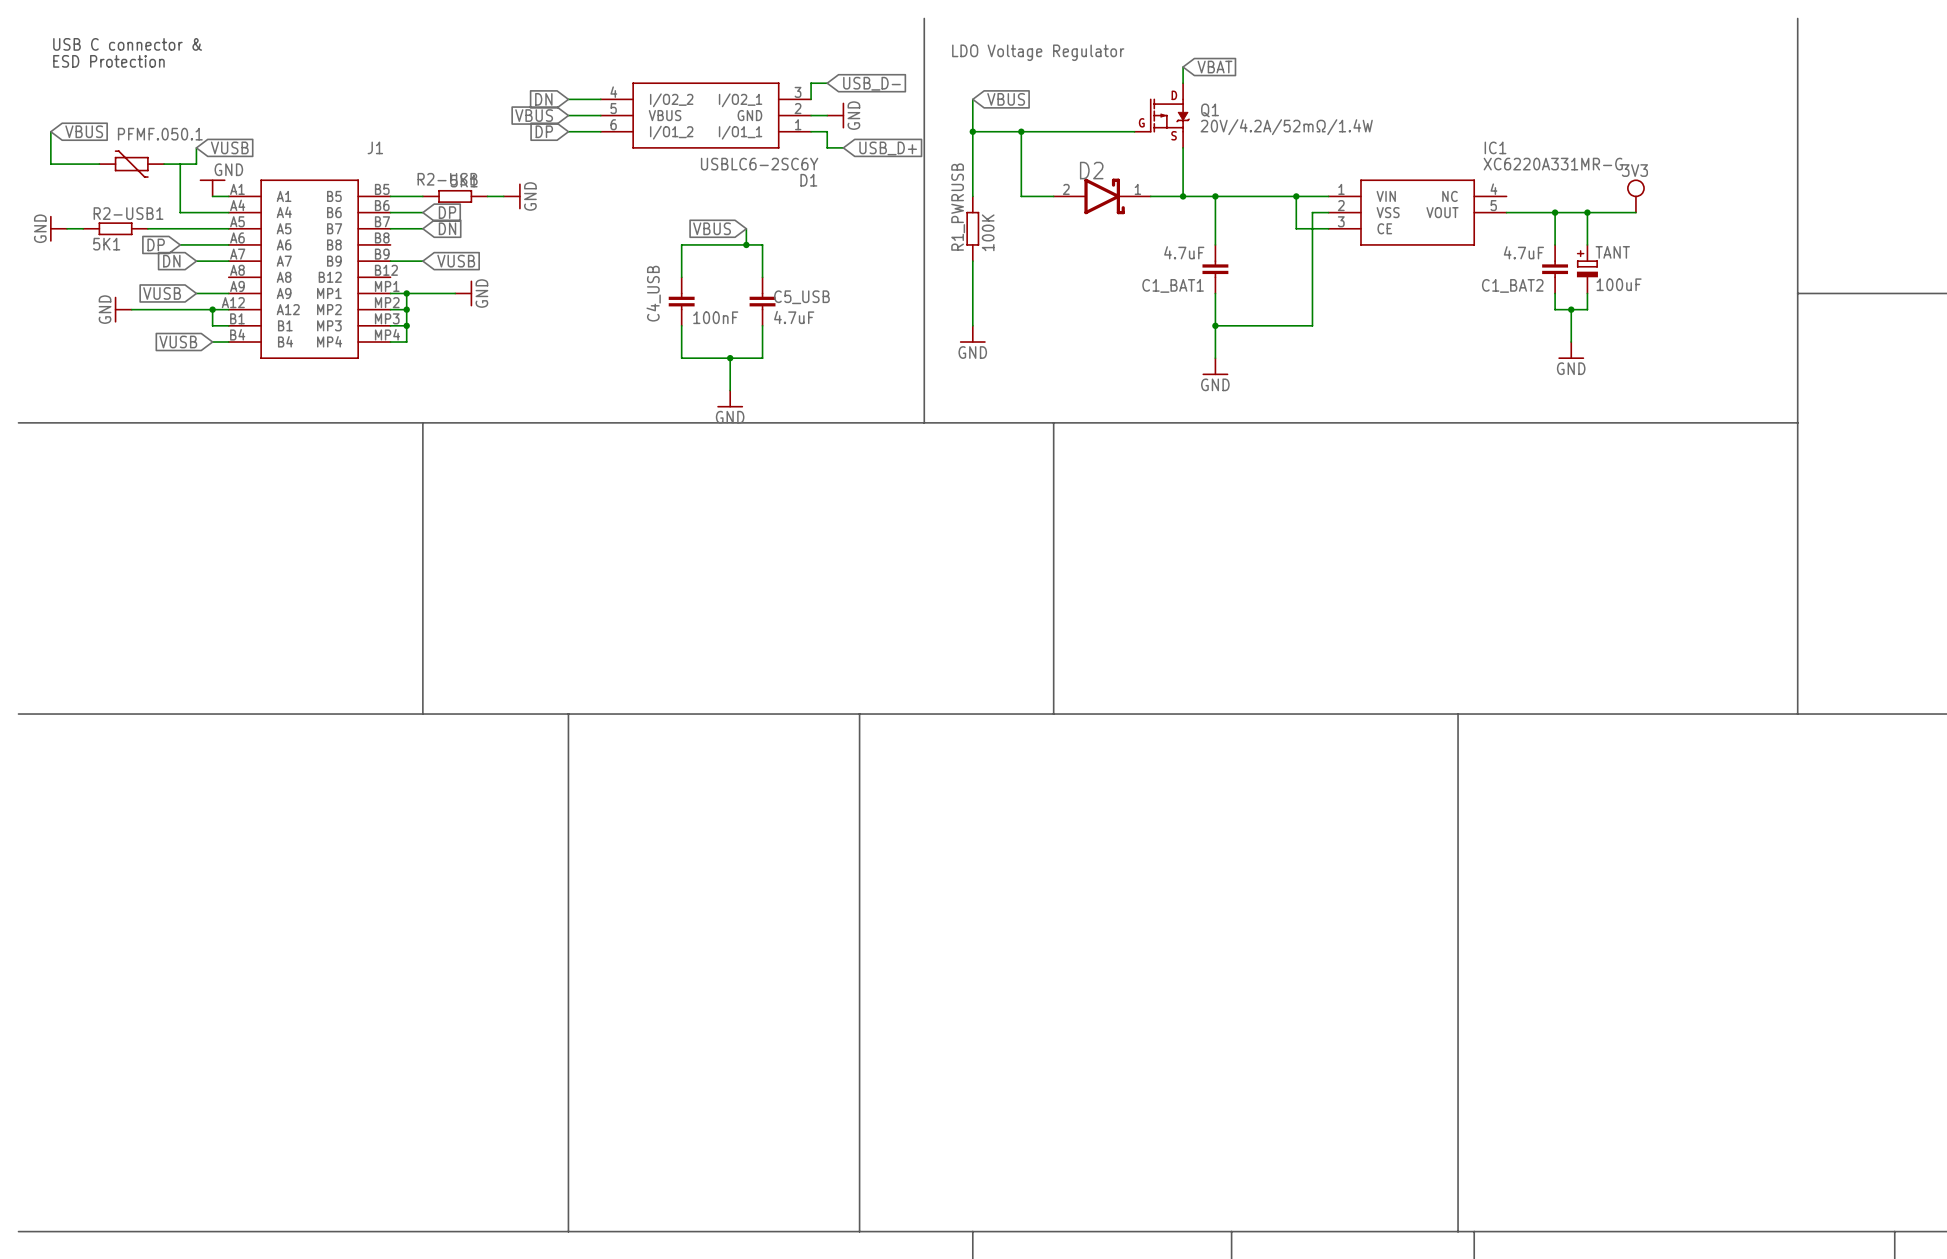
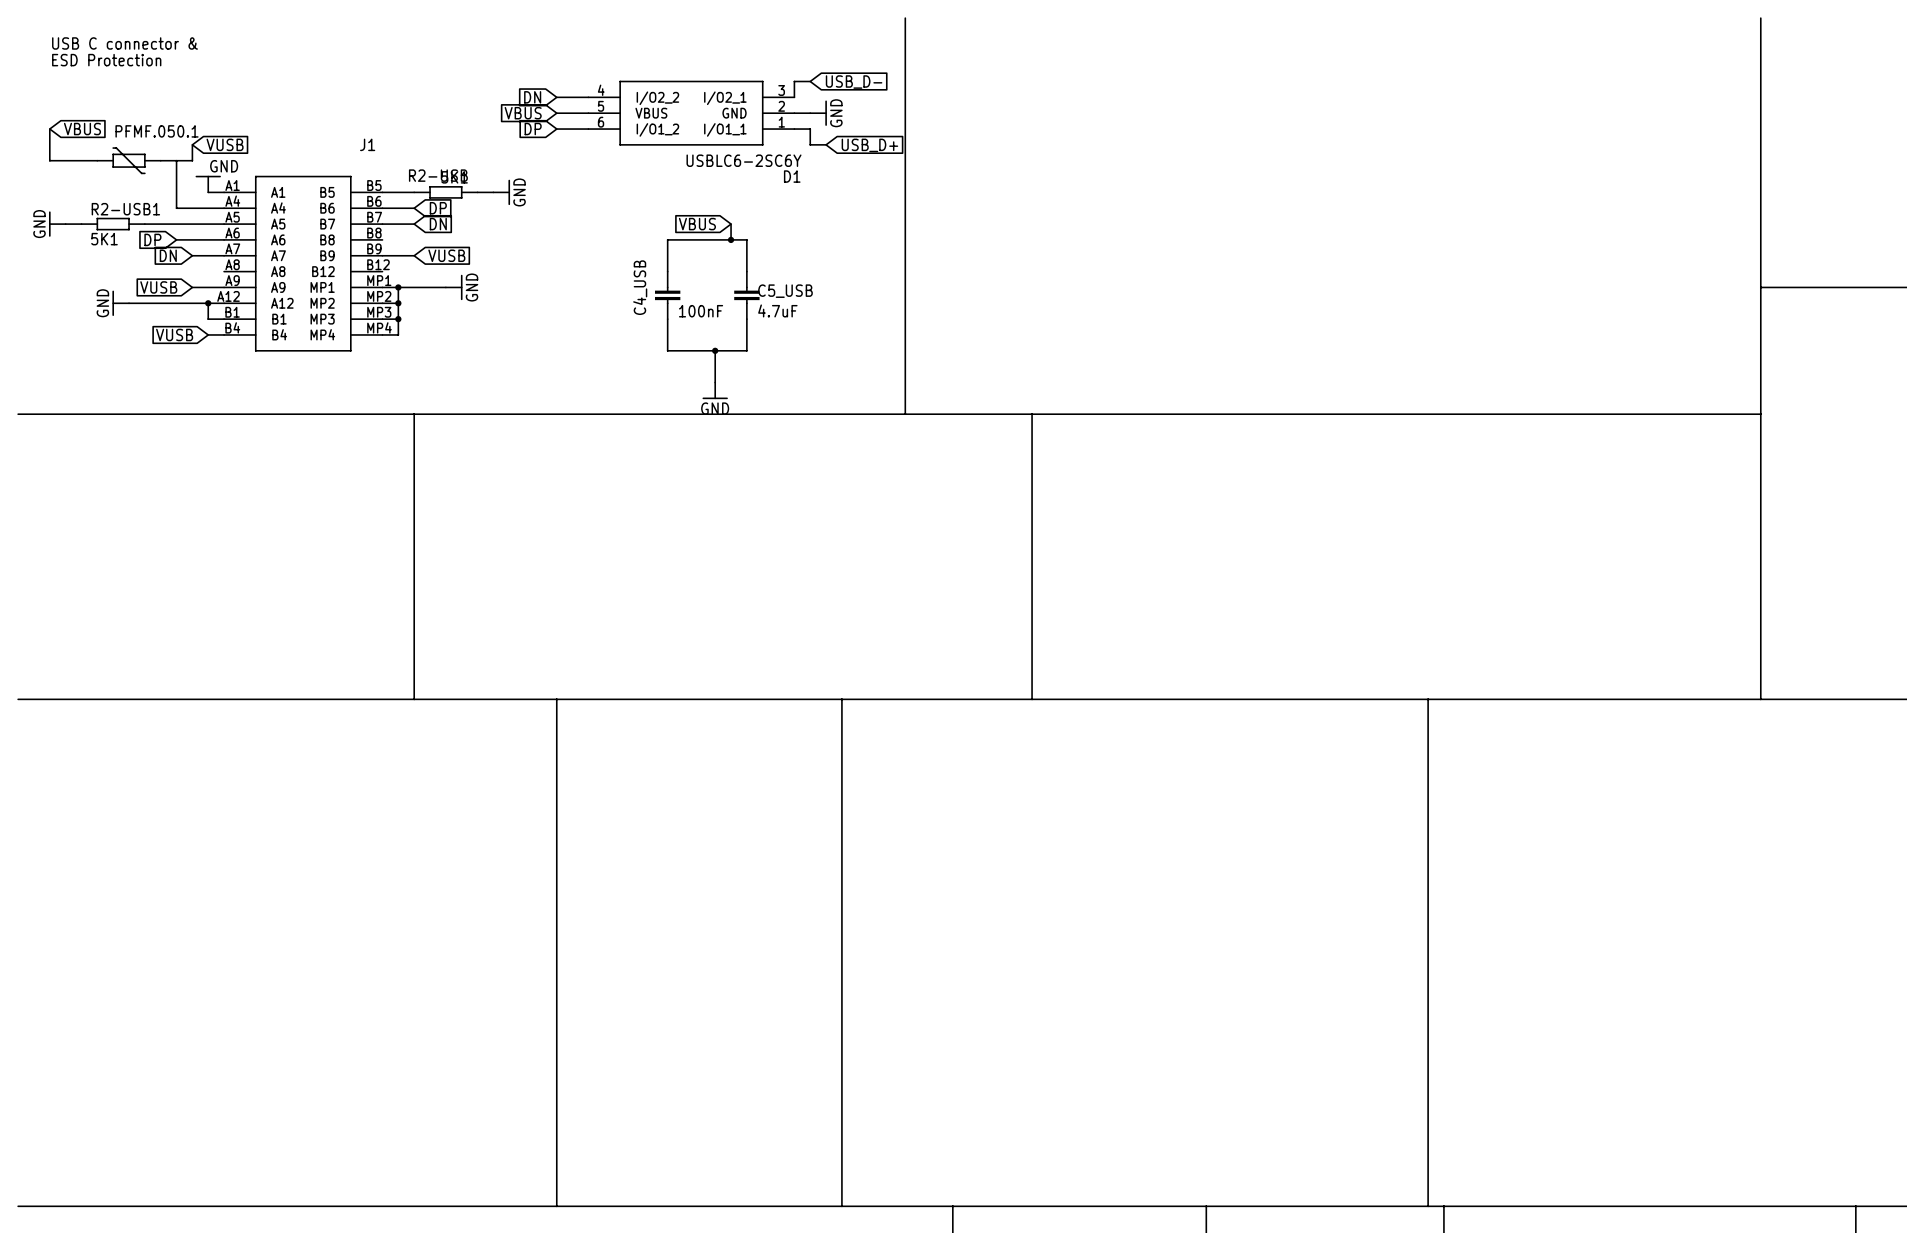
text: LDO Voltage Regulator (1038, 52) -> none
wire: (1183, 67) (1183, 83) -> none
global label: VBAT (1214, 67) -> none
wire: (972, 99) (972, 196) -> none
global label: VBUS (1006, 99) -> none
Q1: 20V/4.2A/52mΩ/1.4W (1162, 115) -> none
wire: (972, 131) (1134, 131) -> none
junction: (972, 131) -> none
wire: (1021, 131) (1021, 196) (1053, 196) -> none
junction: (1021, 131) -> none
wire: (1183, 147) (1183, 196) -> none
D2: (1102, 196) -> none
wire: (1150, 196) (1328, 196) -> none
junction: (1183, 196) -> none
wire: (1215, 196) (1215, 244) -> none
junction: (1215, 196) -> none
wire: (1296, 196) (1296, 228) (1328, 228) -> none
junction: (1296, 196) -> none
power symbol: 3V3 (1635, 196) -> none
wire: (1328, 212) (1312, 212) (1312, 325) (1215, 325) -> none
IC1: XC6220A331MR-G (1417, 212) -> none
wire: (1506, 212) (1635, 212) -> none
wire: (1555, 212) (1555, 244) -> none
junction: (1555, 212) -> none
wire: (1587, 212) (1587, 244) -> none
junction: (1587, 212) -> none
R1_PWRUSB: 100K (972, 228) -> none
wire: (972, 261) (972, 325) -> none
C1_BAT1: 4.7uF (1215, 269) -> none
C1_BAT2: 4.7uF (1555, 269) -> none
TANT: 100uF (1587, 269) -> none
wire: (1215, 293) (1215, 358) -> none
wire: (1555, 293) (1555, 309) (1587, 309) (1587, 293) -> none
wire: (1571, 309) (1571, 342) -> none
junction: (1571, 309) -> none
junction: (1215, 325) -> none
power symbol: GND (972, 334) -> none
power symbol: GND (1571, 350) -> none
power symbol: GND (1215, 366) -> none

